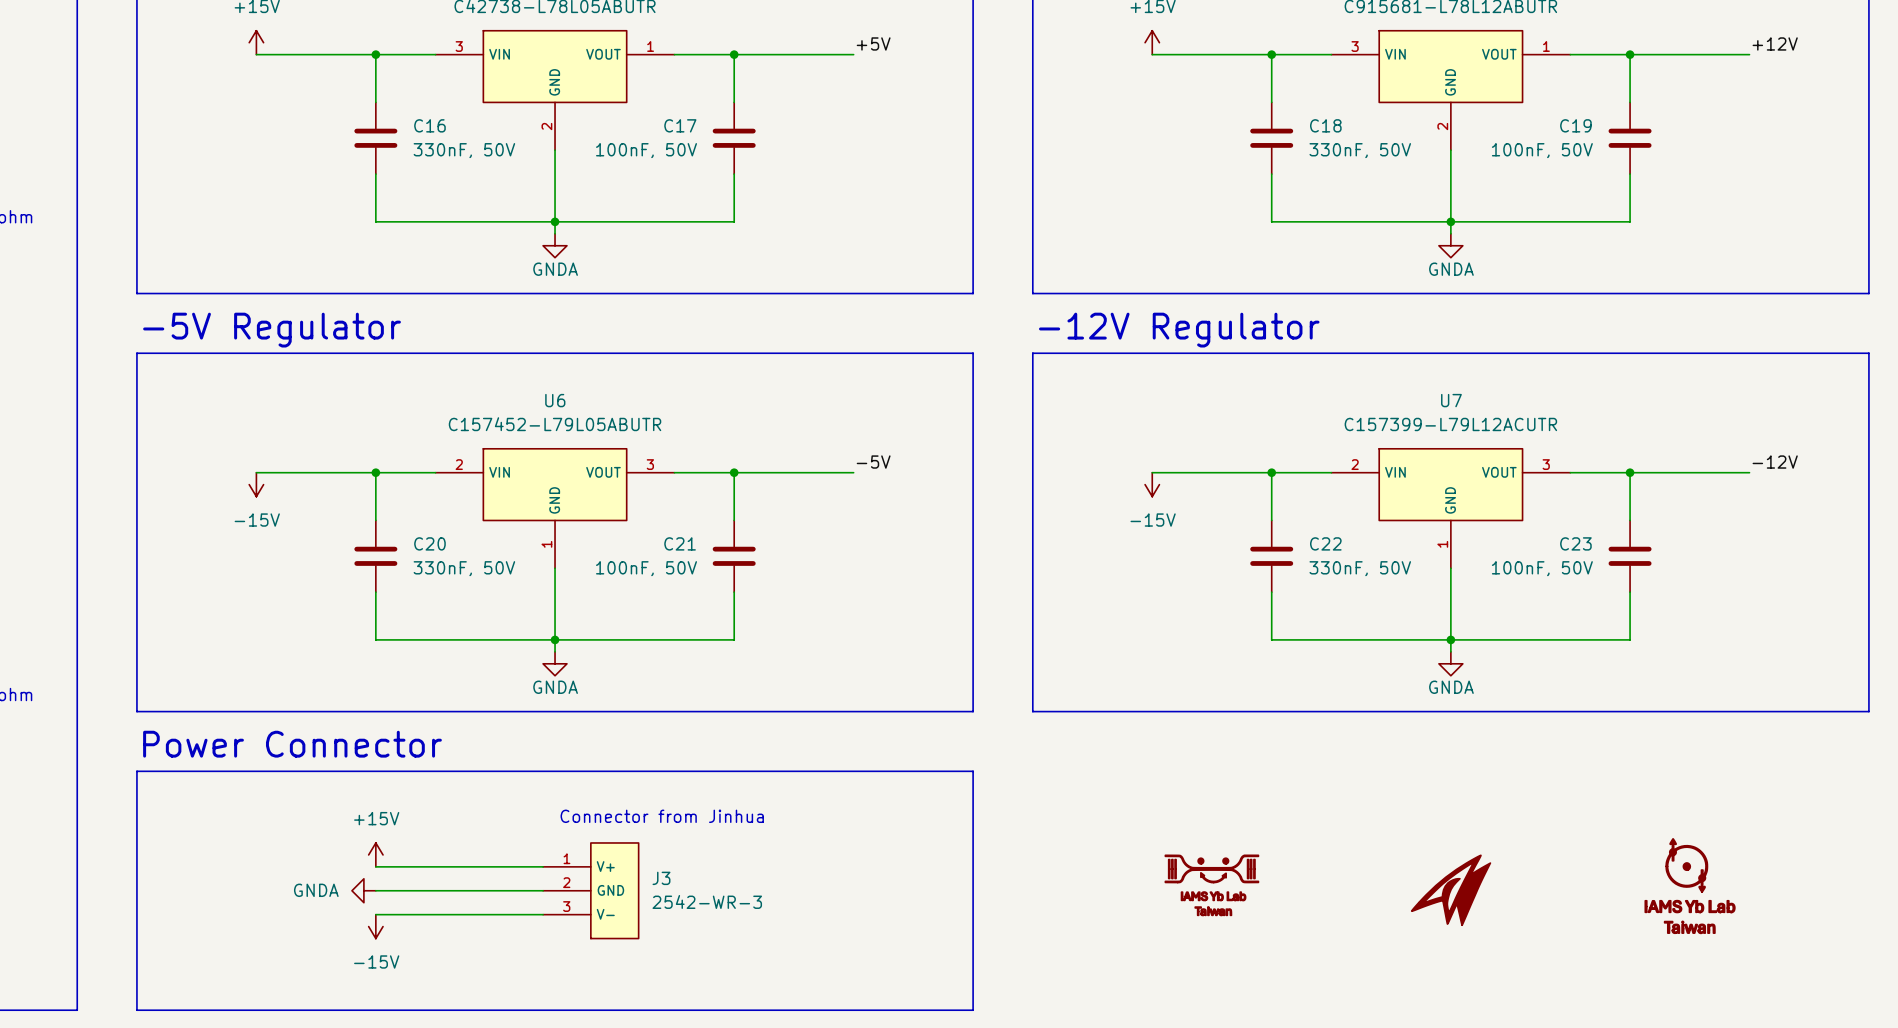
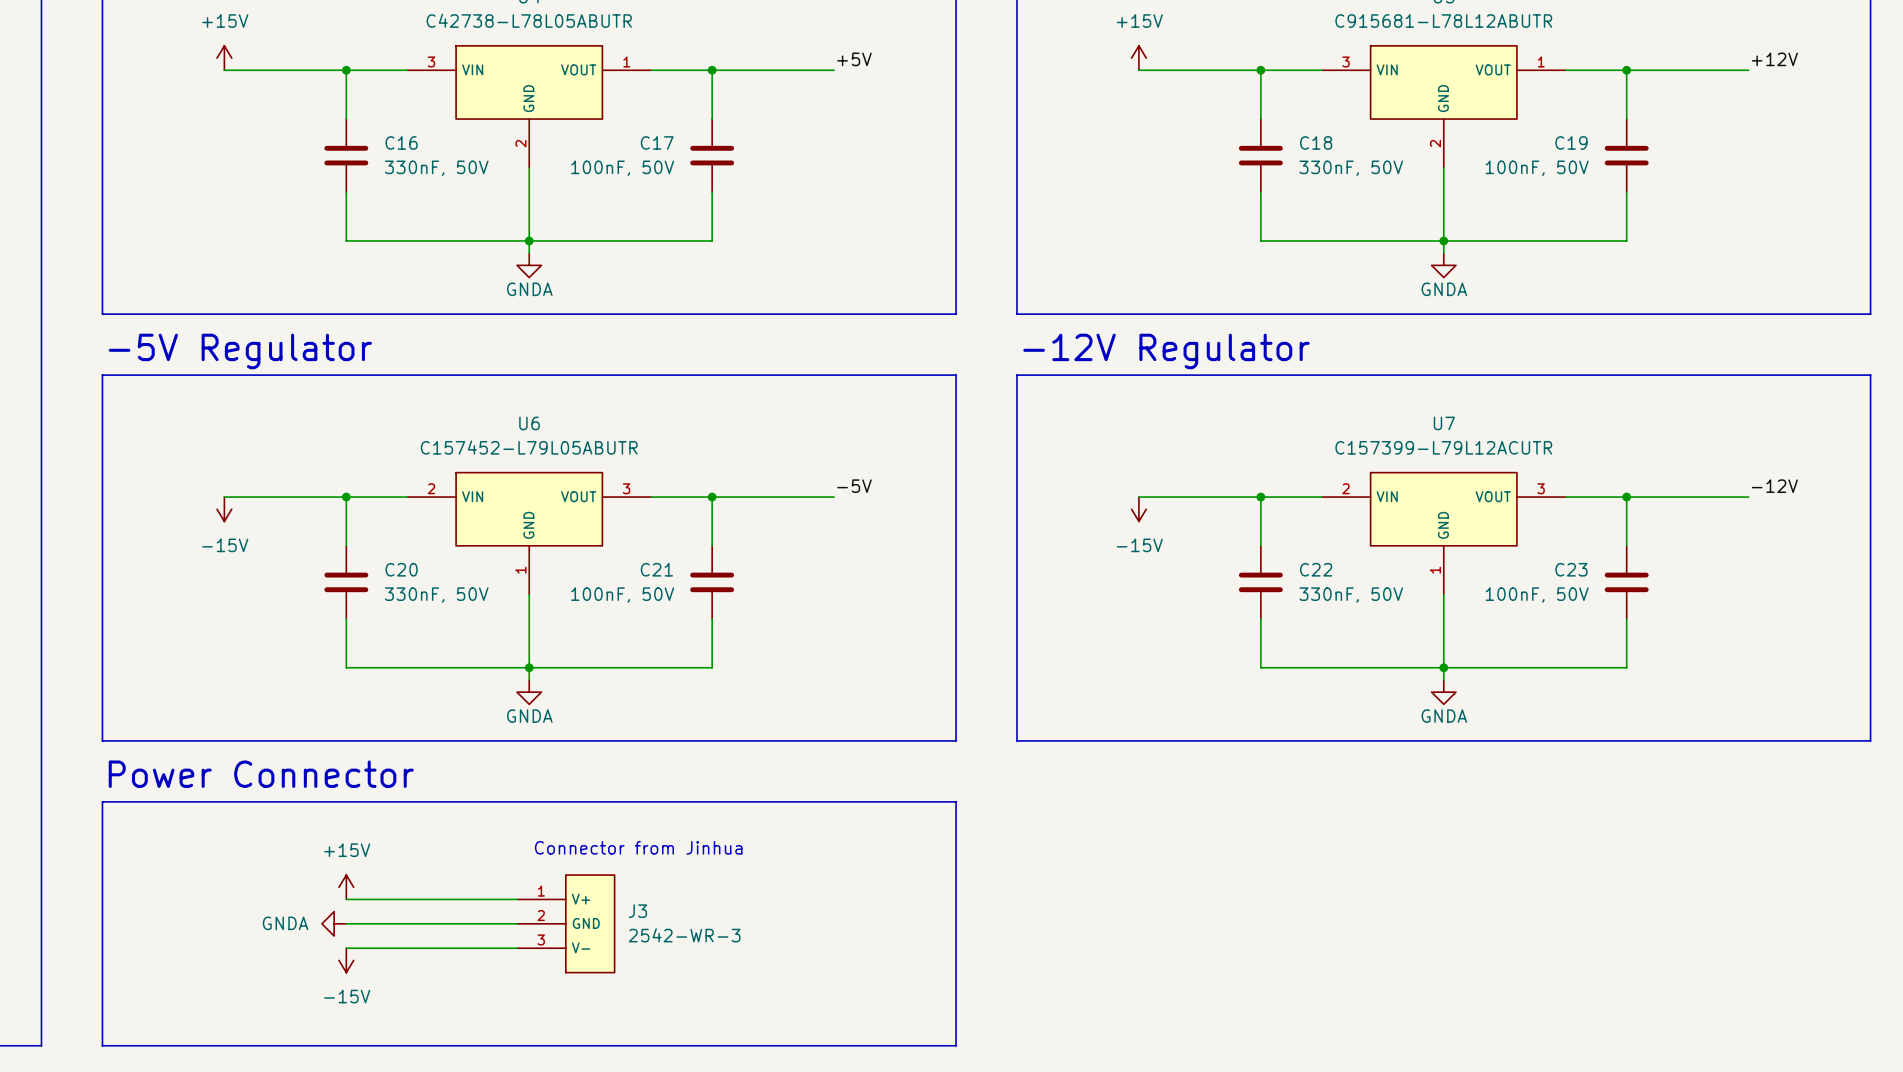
part: (1211, 885) -> none
part: (1690, 886) -> none
part: (1451, 890) -> none

